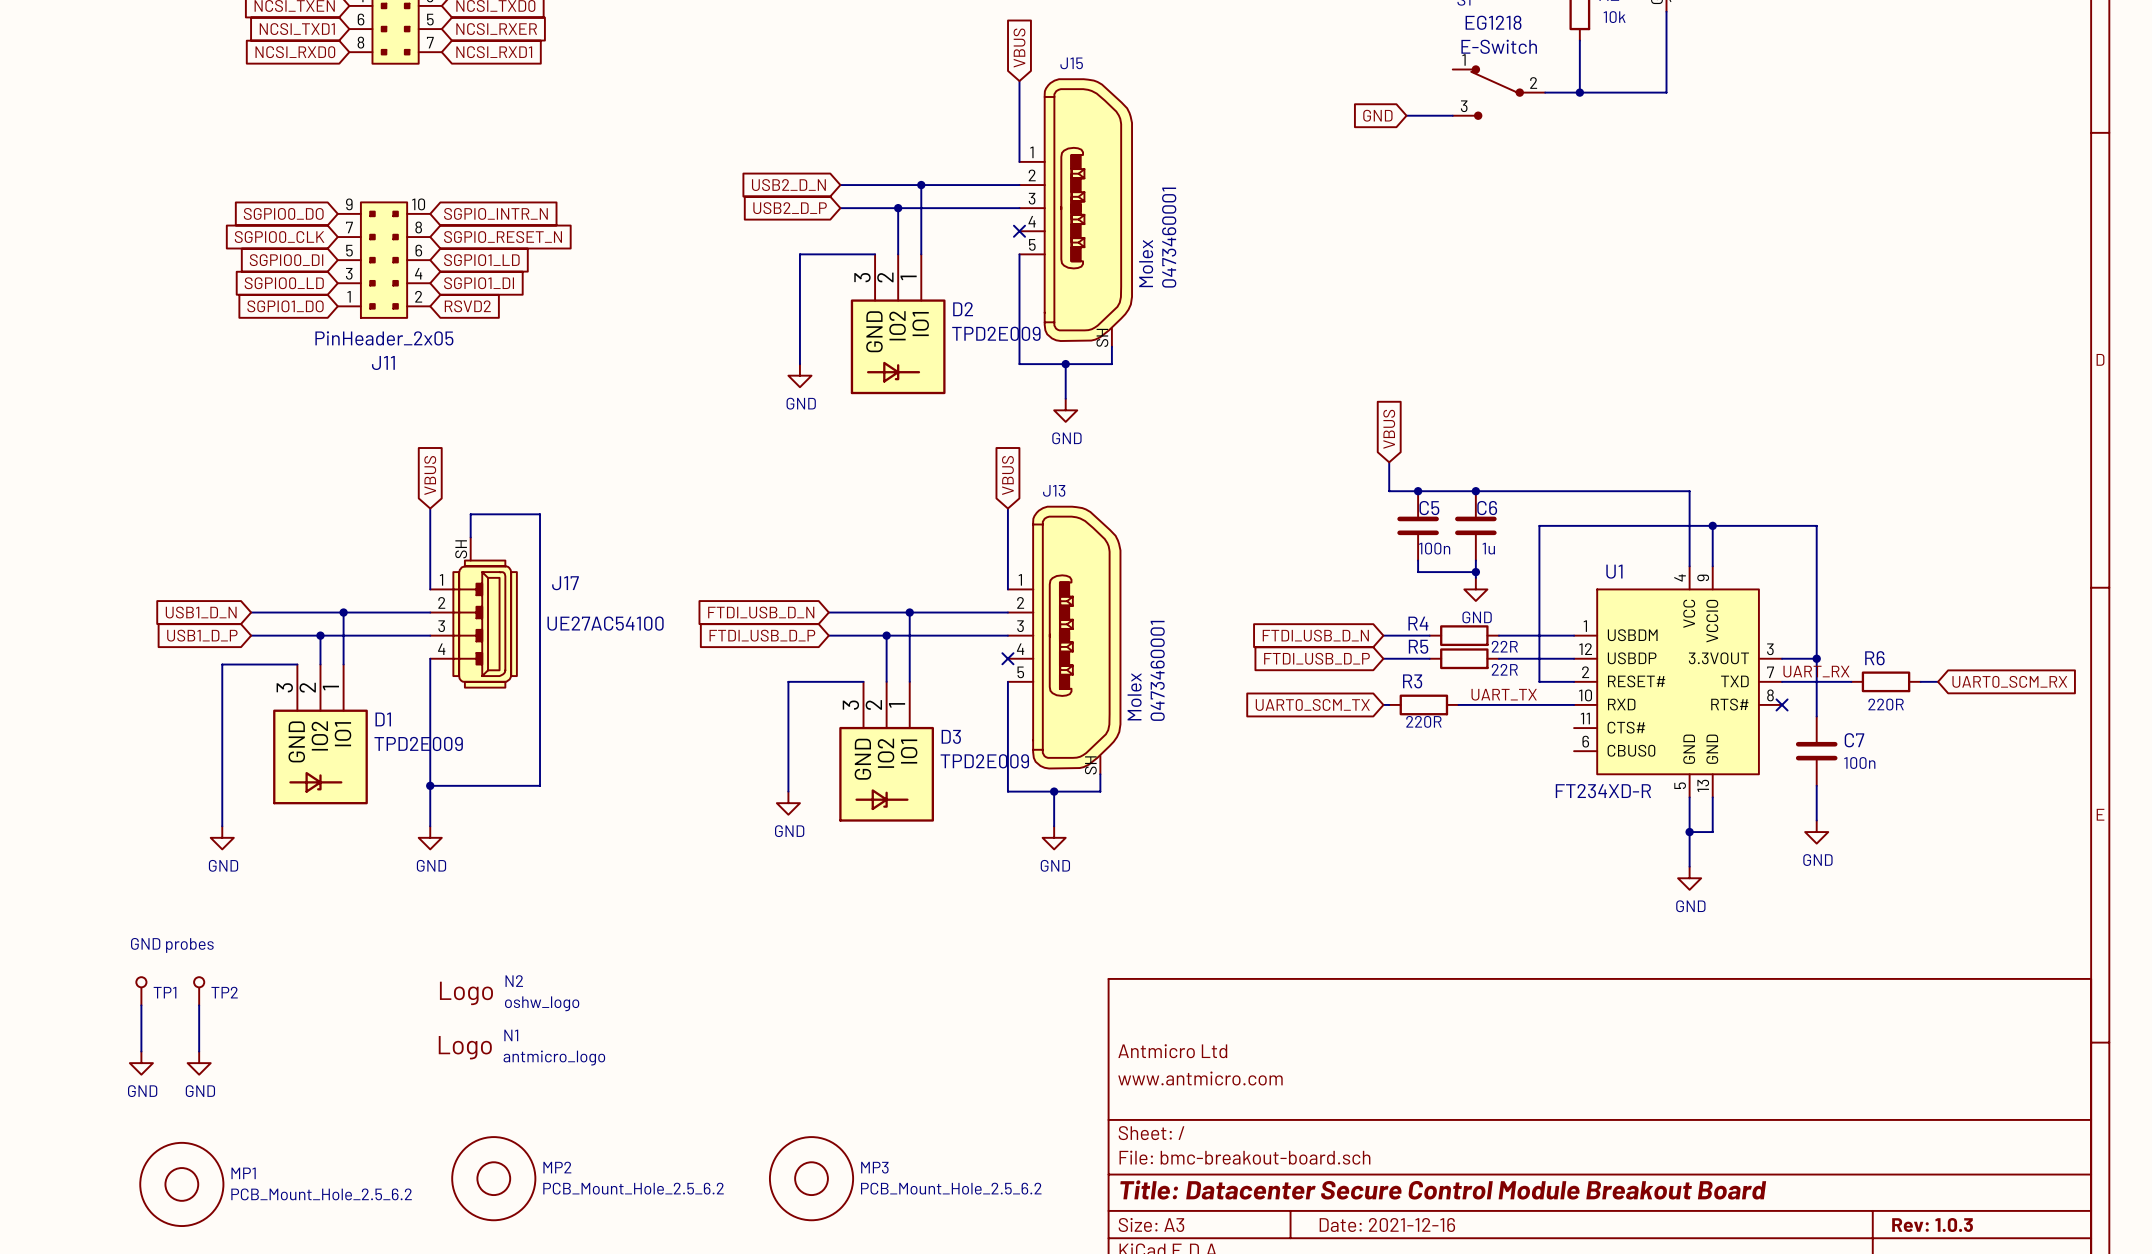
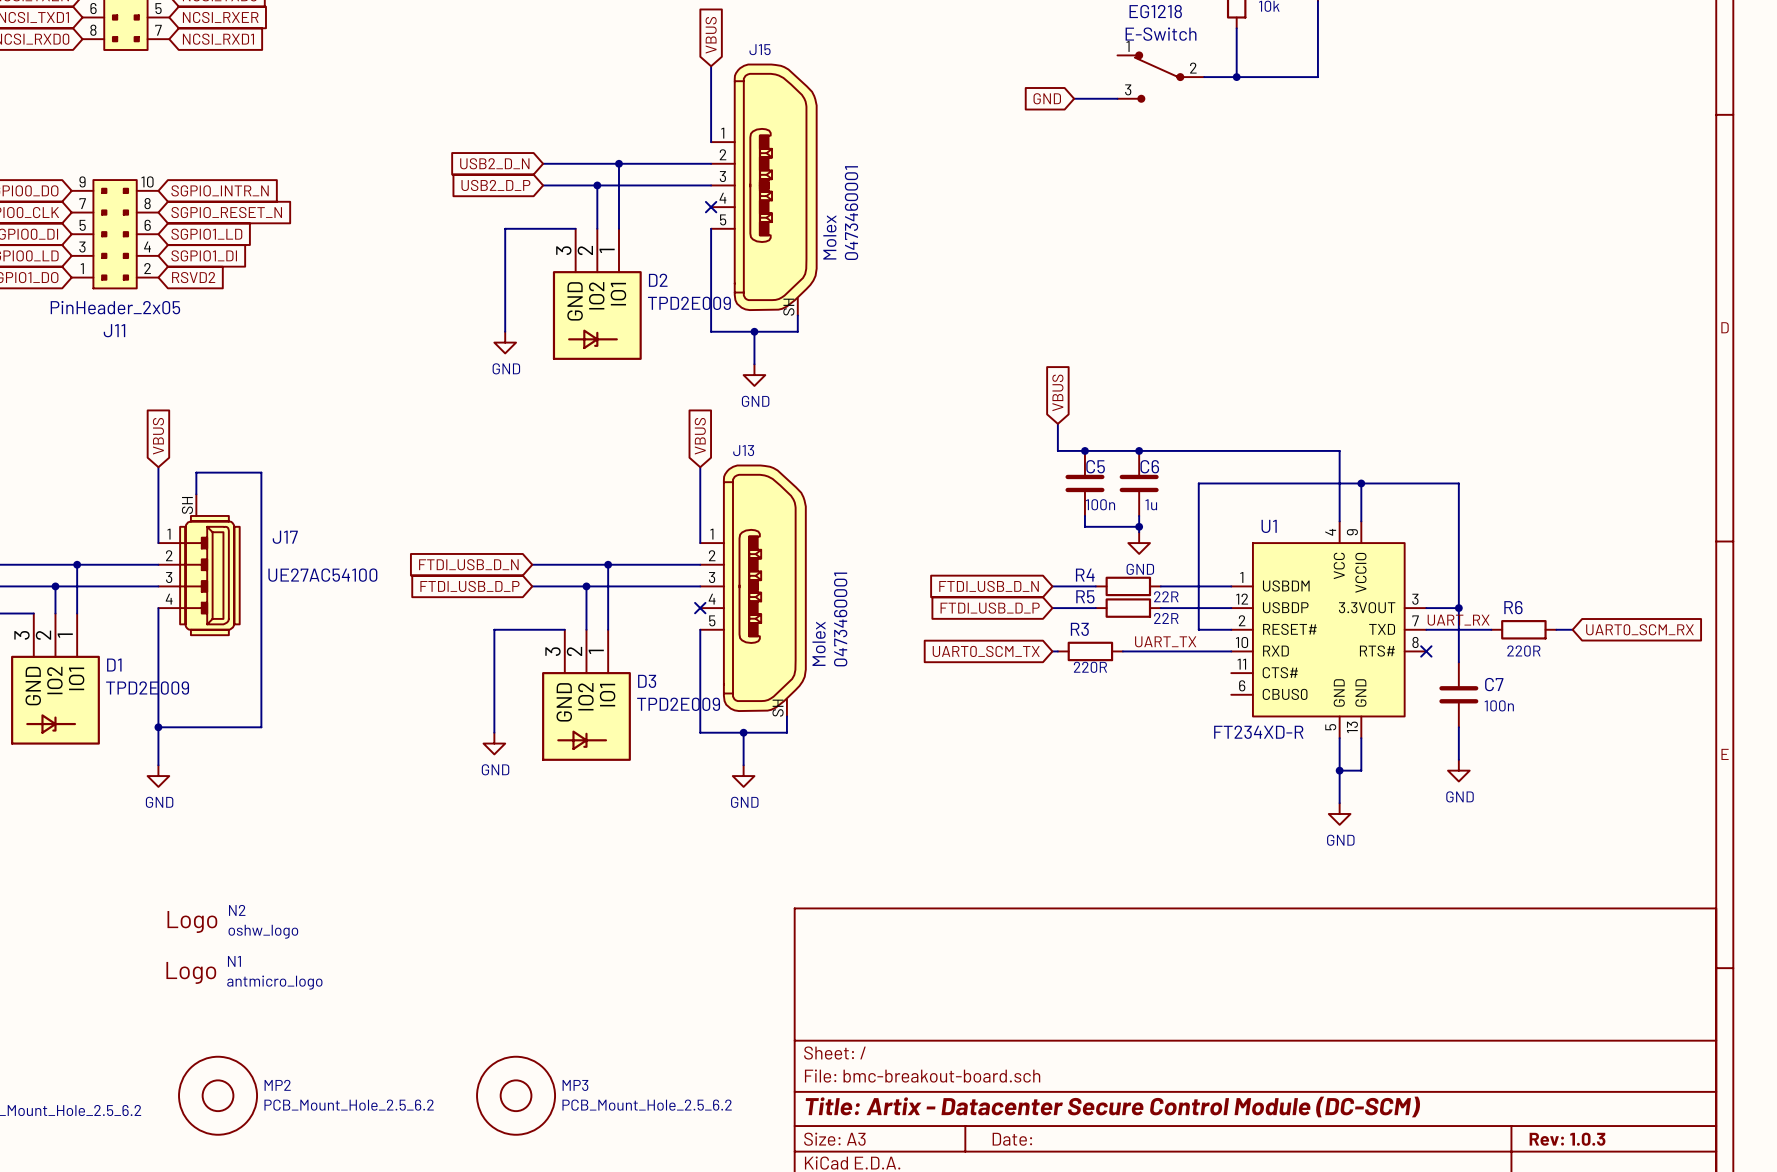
title block: Antmicro Ltd (1172, 1051) -> none
title block: www.antmicro.com (1200, 1078) -> none
title block: Title: Datacenter Secure Control Module Breakout Board (1443, 1189) -> Title: Artix - Datacenter Secure Control Module (DC-SCM) (1112, 1107)
title block: Date: 2021-12-16 (1387, 1224) -> Date: (1012, 1139)

